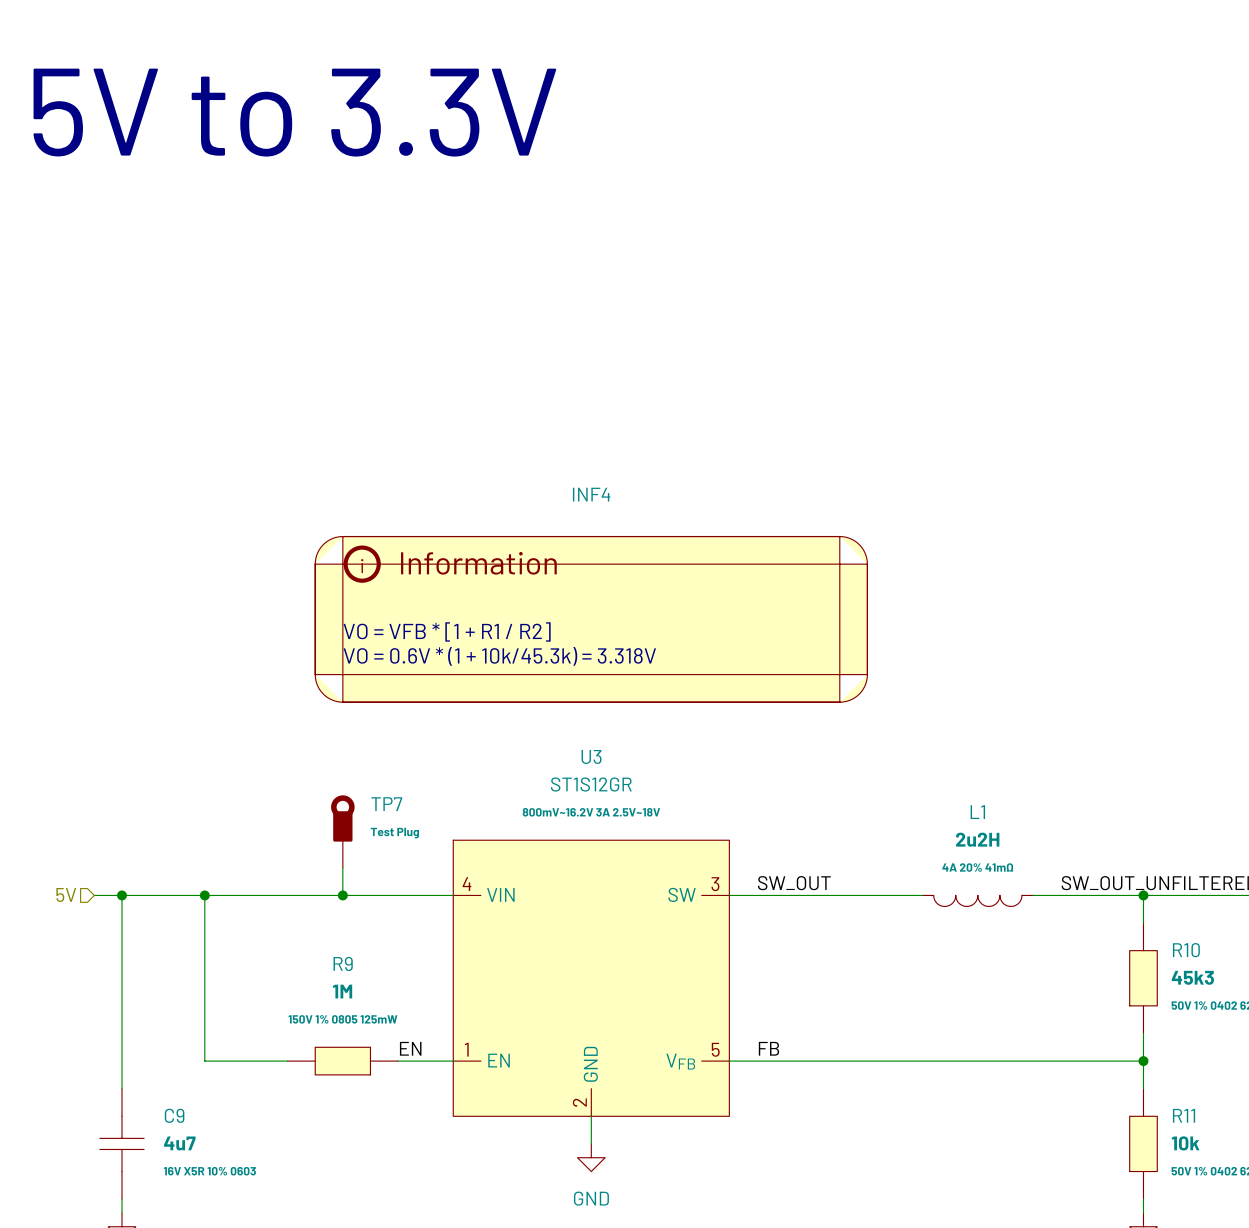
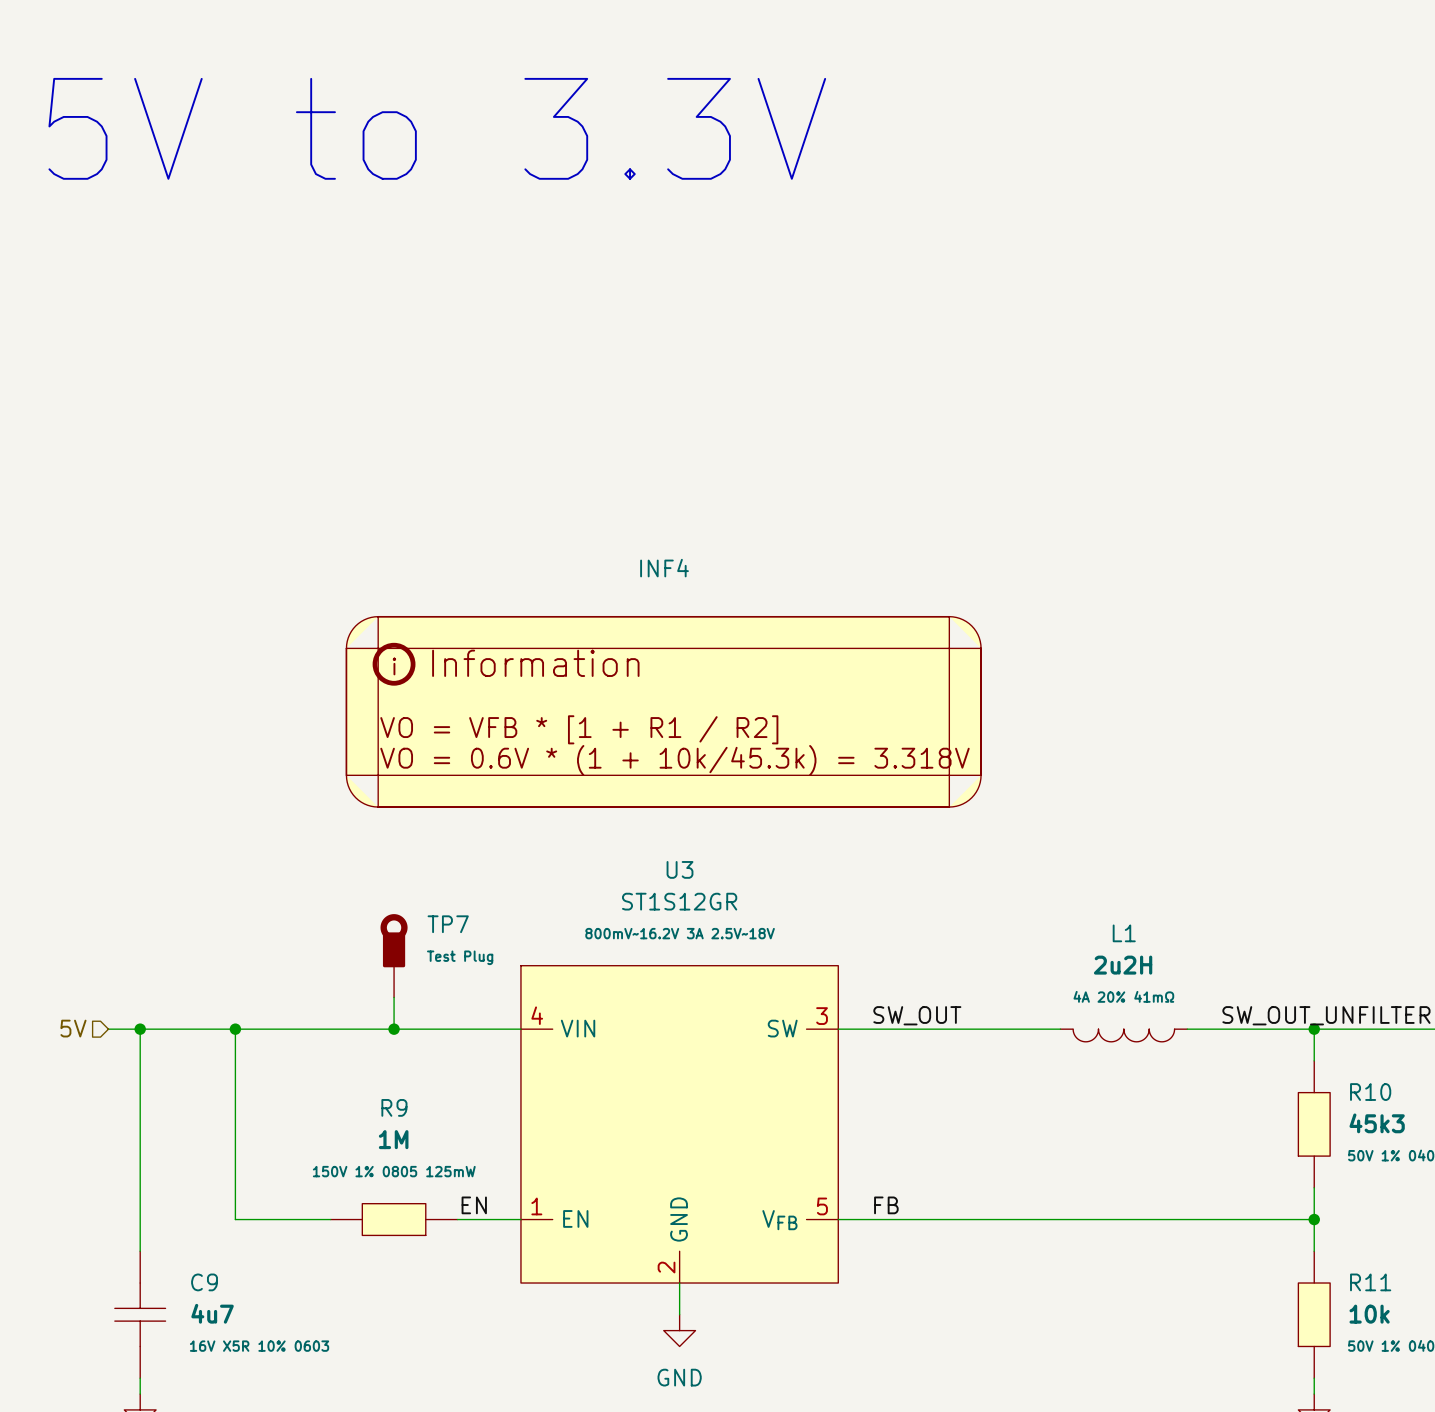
INF4 symbol: [315, 536, 868, 703] -> [346, 616, 982, 808]
text: VO = VFB * [1 + R1 / R2] (447, 631) -> none
text: VO = 0.6V * (1 + 10k/45.3k) = 3.318V (499, 656) -> none

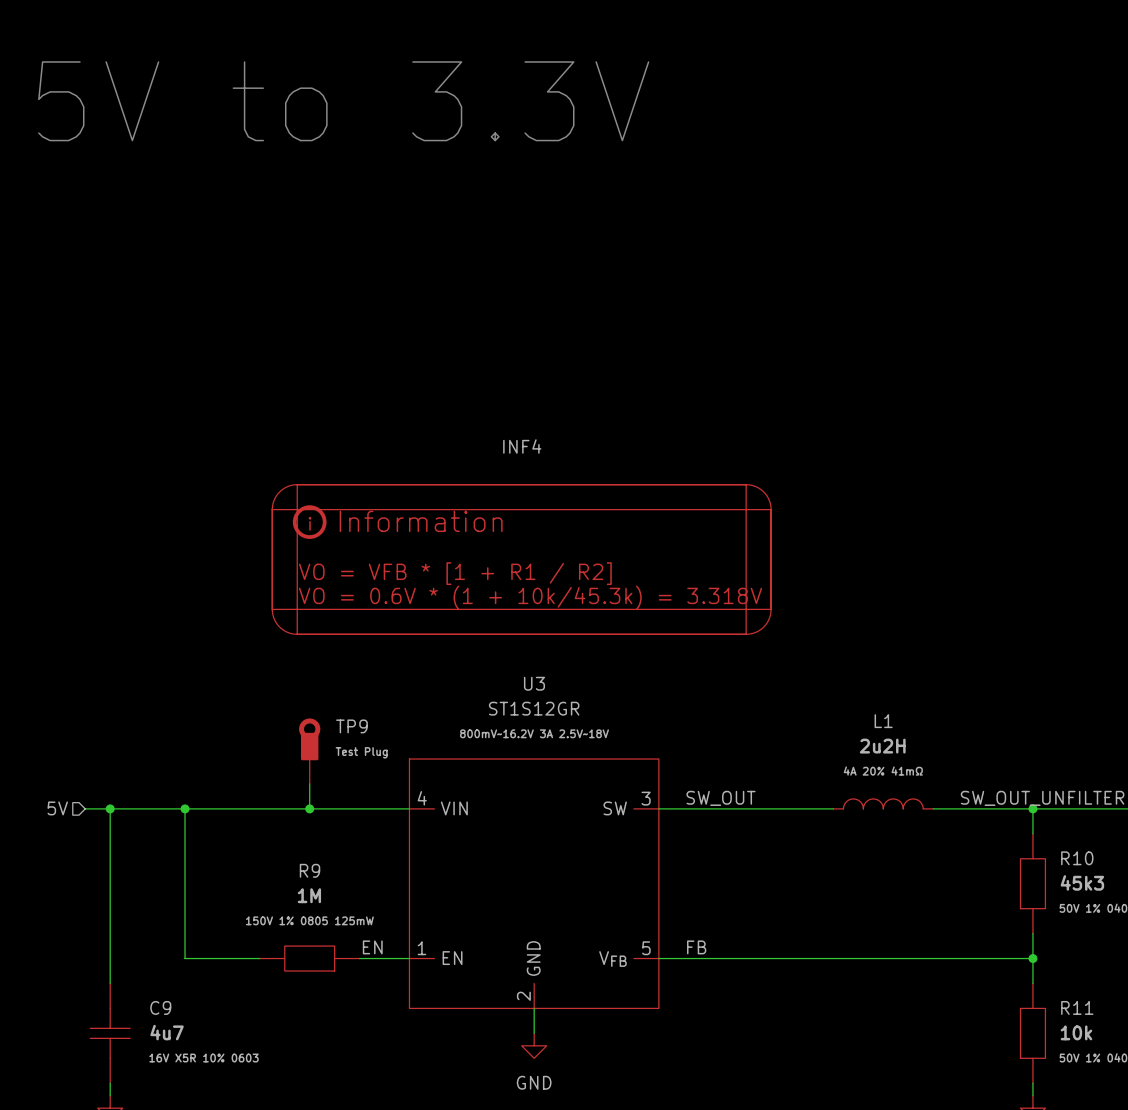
TP7 name: TP7 (448, 924) -> TP9 (351, 726)
L1 rotation: 0° (1123, 1035) -> 180° (883, 803)

